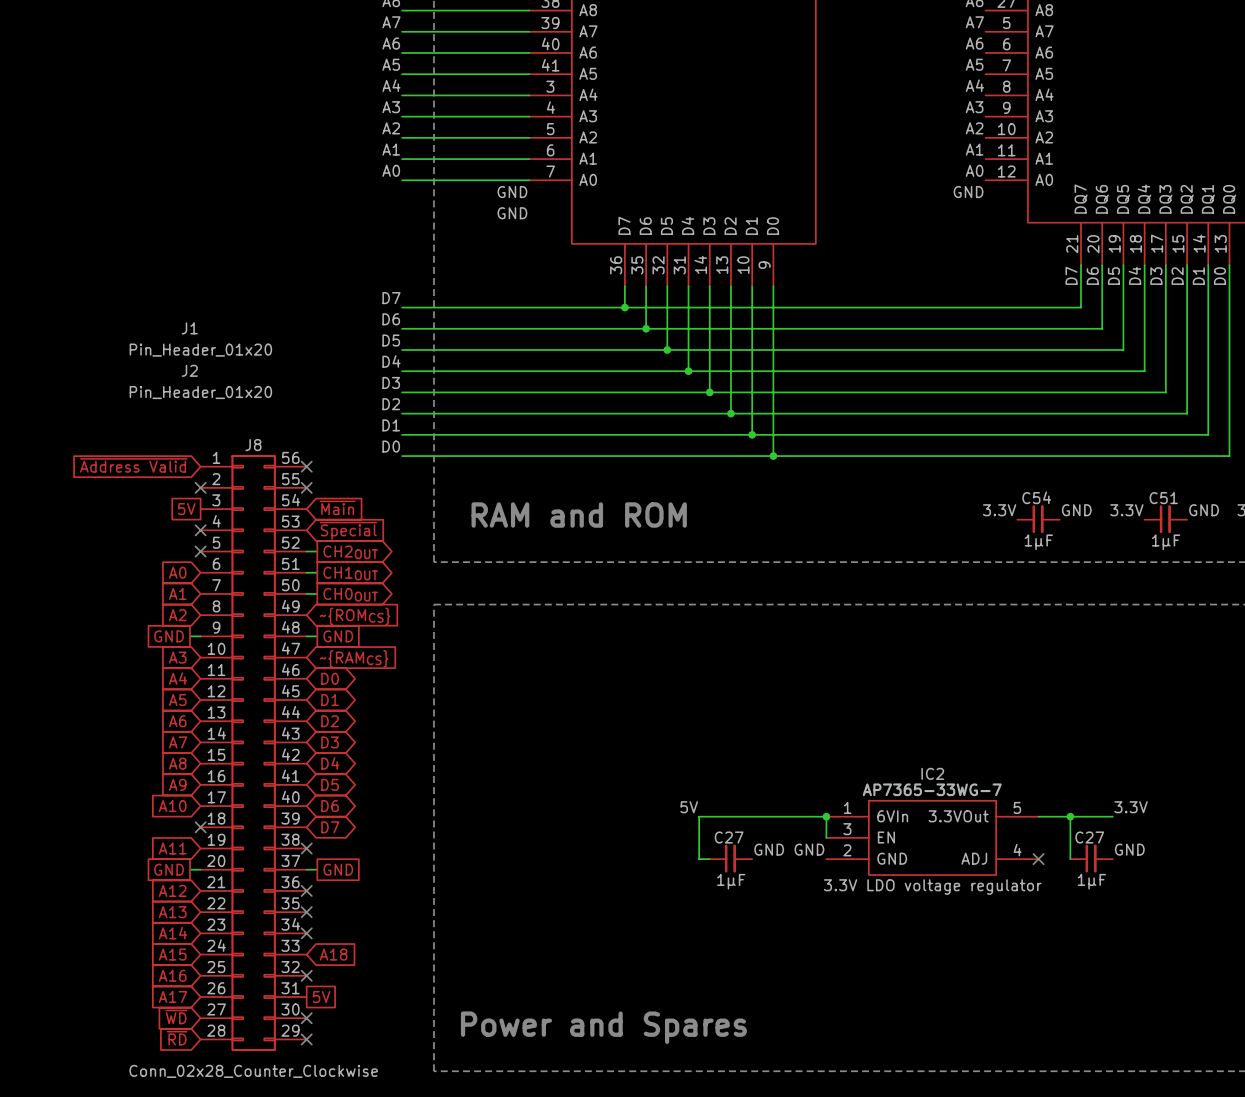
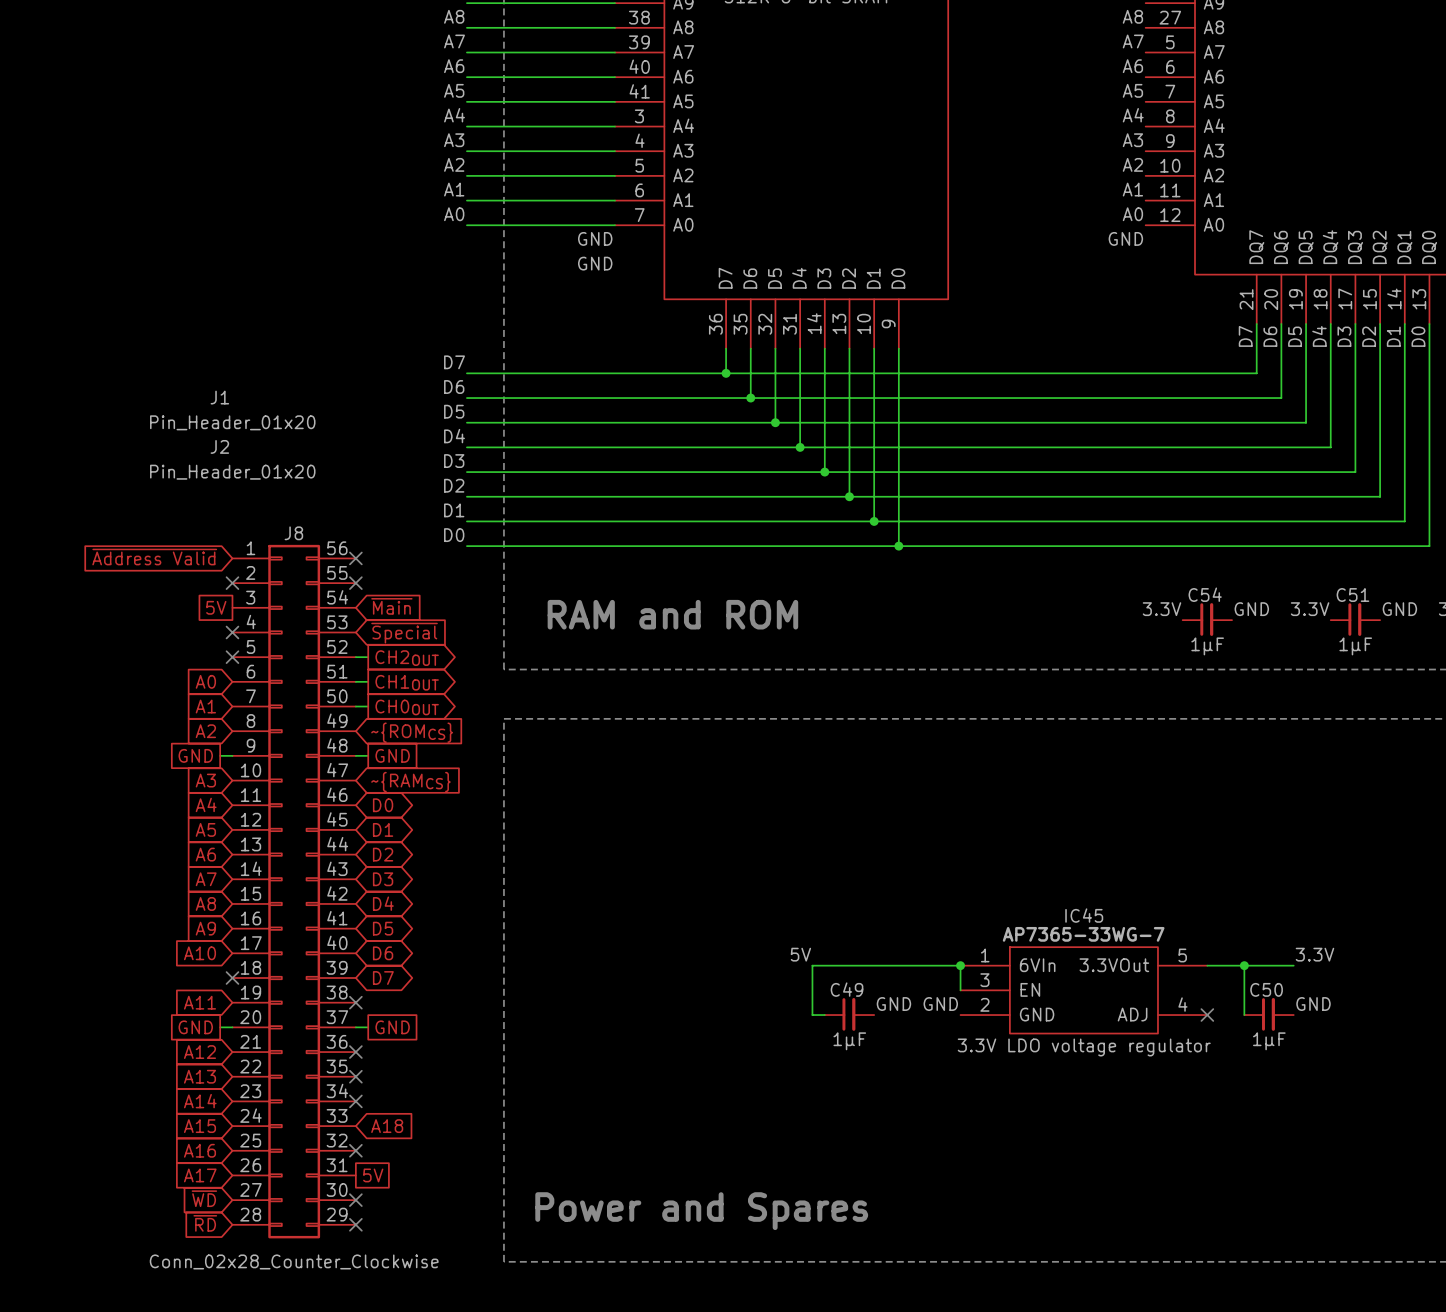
IC2 name: IC2 (932, 773) -> IC45 (1084, 915)
C27 name: C27 (729, 837) -> C49 (847, 989)
C27 name: C27 (1089, 837) -> C50 (1266, 989)

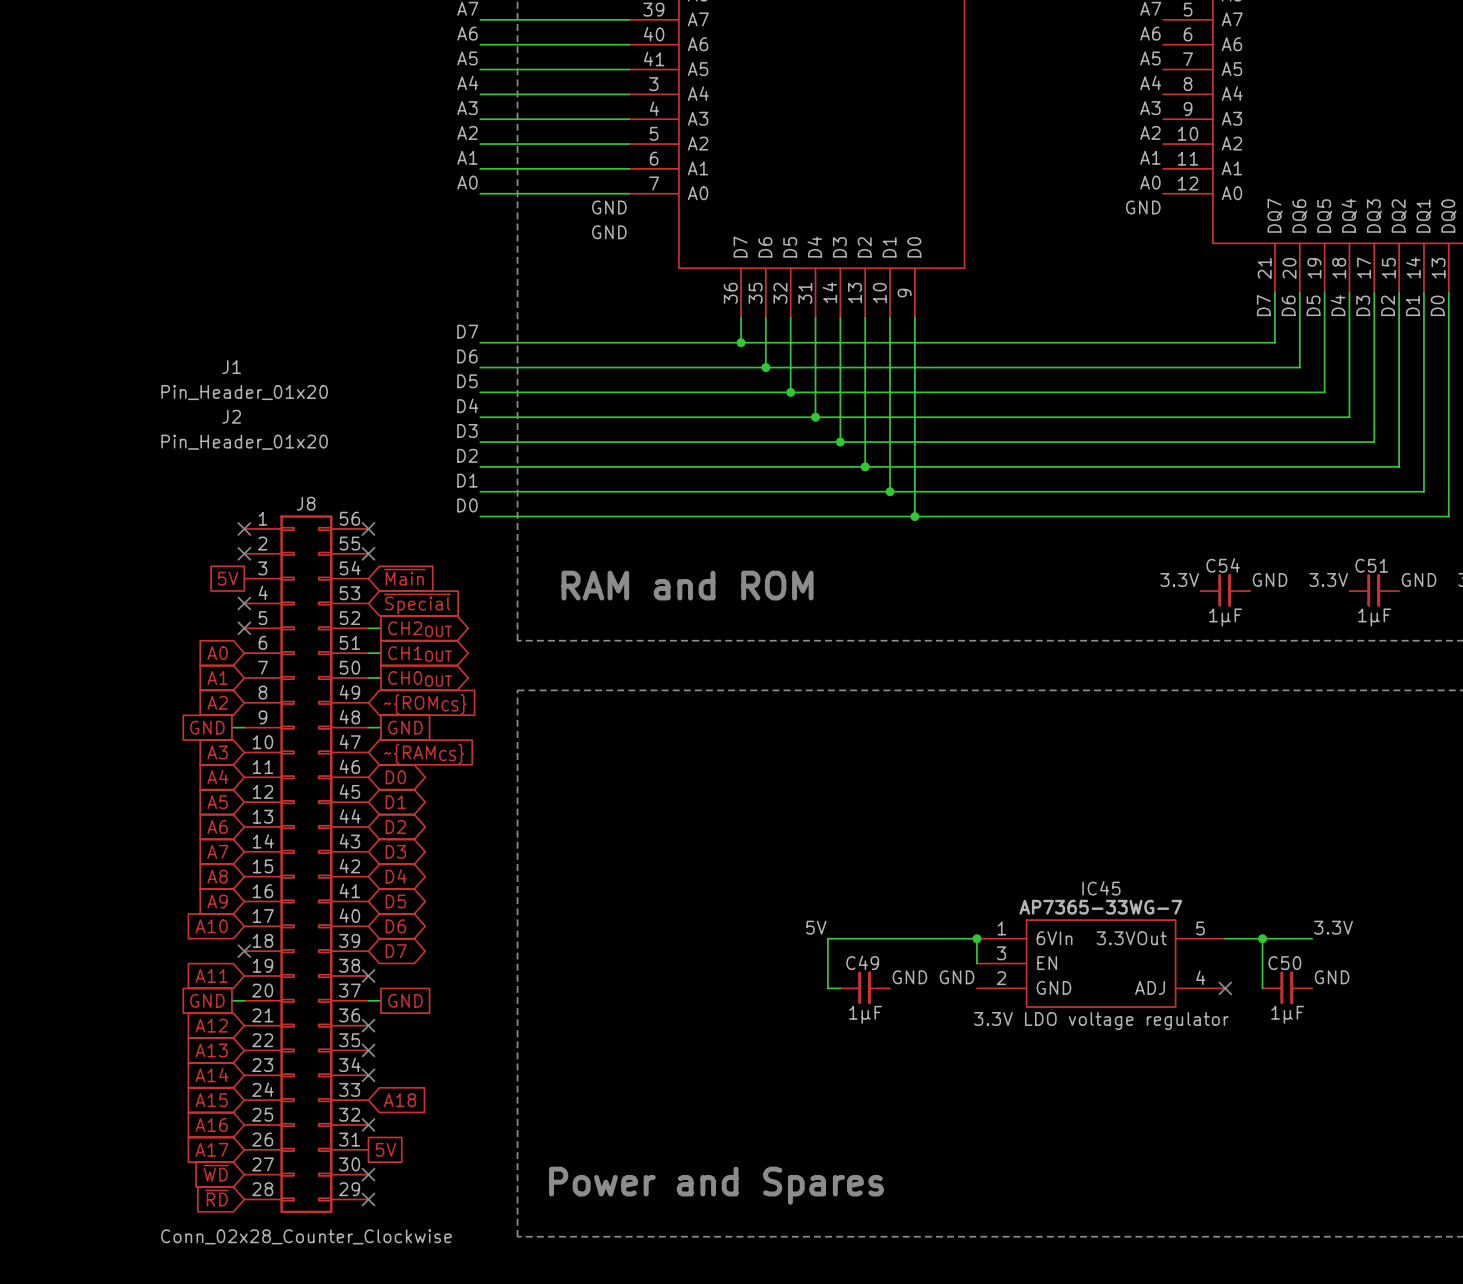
global label: ~{Address Valid} (154, 557) -> none
no-connect mark: none -> (244, 528)

